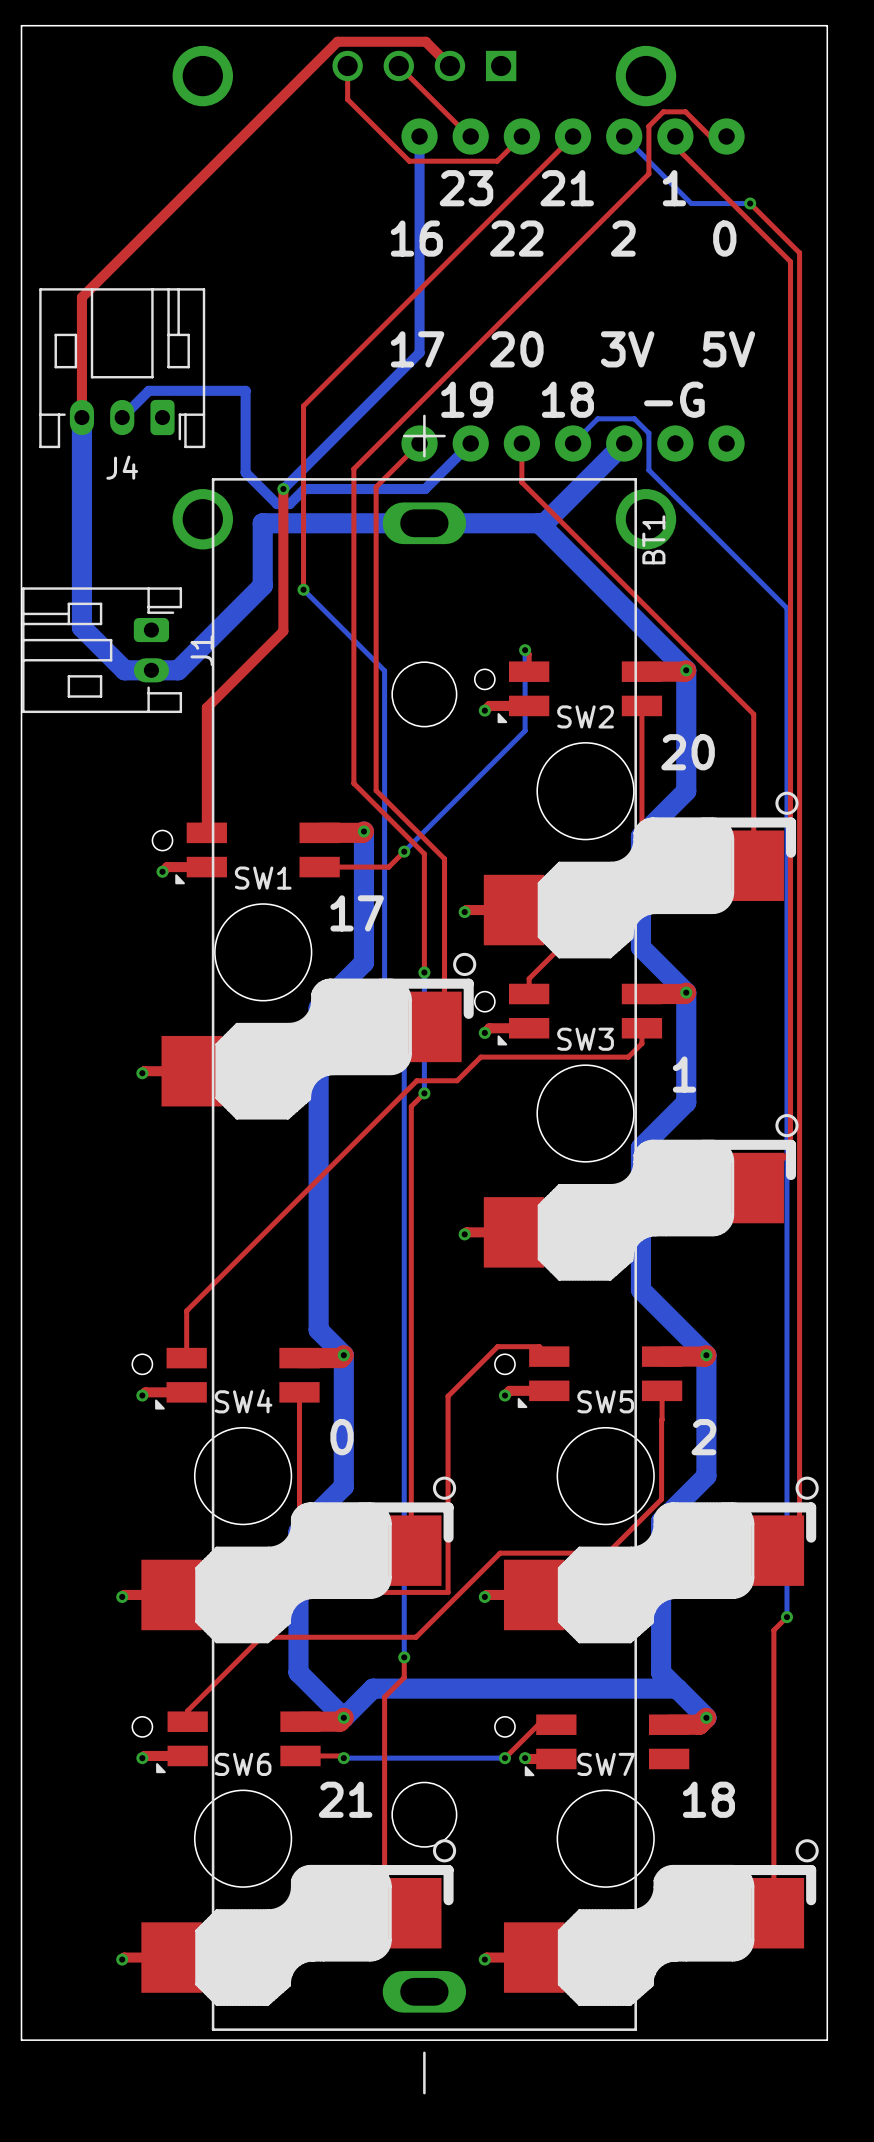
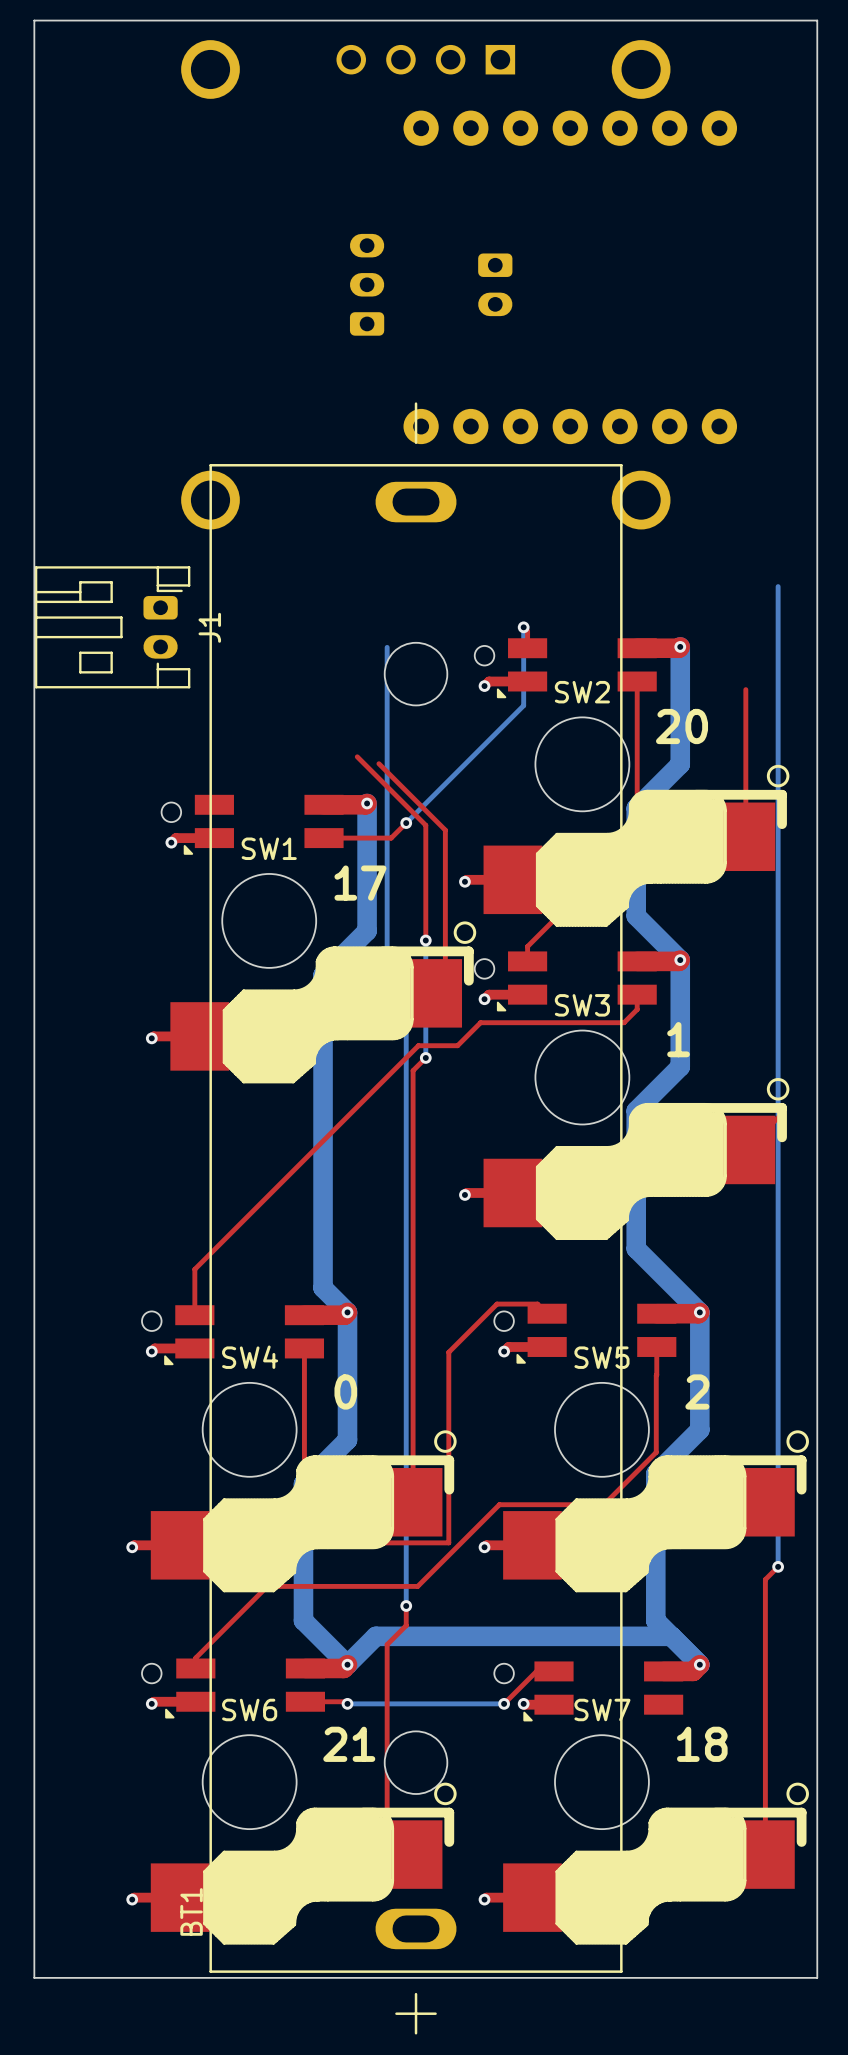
top track: (347, 65) (347, 99) (409, 161) (497, 161) (521, 136) -> none
top track: (398, 65) (470, 137) (470, 146) -> none
top track: (449, 65) (425, 41) (337, 41) (81, 297) (81, 417) -> none
bottom track: (419, 136) (419, 352) (283, 489) -> none
top track: (573, 136) (303, 406) (303, 589) -> none
bottom track: (624, 136) (691, 203) (750, 203) -> none
top track: (675, 136) (675, 146) (790, 261) (790, 1151) -> none
top track: (726, 136) (710, 136) (685, 111) (663, 111) (648, 126) (648, 173) (353, 468) (353, 783) -> none
text: 23 (466, 188) -> none
text: 21 (567, 188) -> none
text: 1 (674, 188) -> none
top track: (750, 203) (799, 252) (799, 1524) -> none
via: (750, 203) -> none
text: 16 (416, 238) -> none
text: 22 (516, 238) -> none
text: 2 (623, 238) -> none
text: 0 (724, 238) -> none
part: none -> (495, 284)
text: 17 (417, 349) -> none
text: 20 (516, 349) -> none
text: 3V (627, 349) -> none
text: 5V (729, 349) -> none
J4 side: top (122, 368) -> bottom (367, 284)
text: 19 (467, 399) -> none
text: 18 (567, 399) -> none
text: -G (674, 399) -> none
bottom track: (81, 417) (81, 627) (124, 670) (178, 670) (262, 585) (262, 523) (544, 523) (624, 443) -> none
bottom track: (122, 417) (148, 390) (245, 390) (245, 472) (277, 504) (289, 504) (304, 489) (425, 489) (470, 443) -> none
top track: (419, 443) (376, 486) (376, 790) -> none
top track: (521, 443) (521, 482) (753, 714) -> none
bottom track: (573, 443) (597, 418) (634, 418) (648, 433) (648, 470) (786, 608) -> none
top track: (283, 489) (283, 631) (206, 707) (206, 832) -> none
via: (283, 489) -> none
bottom track: (539, 523) (686, 670) -> none
bottom track: (303, 589) (384, 670) -> none
via: (303, 589) -> none
BT1 rotation: 0° (424, 1254) -> 180° (416, 1218)

